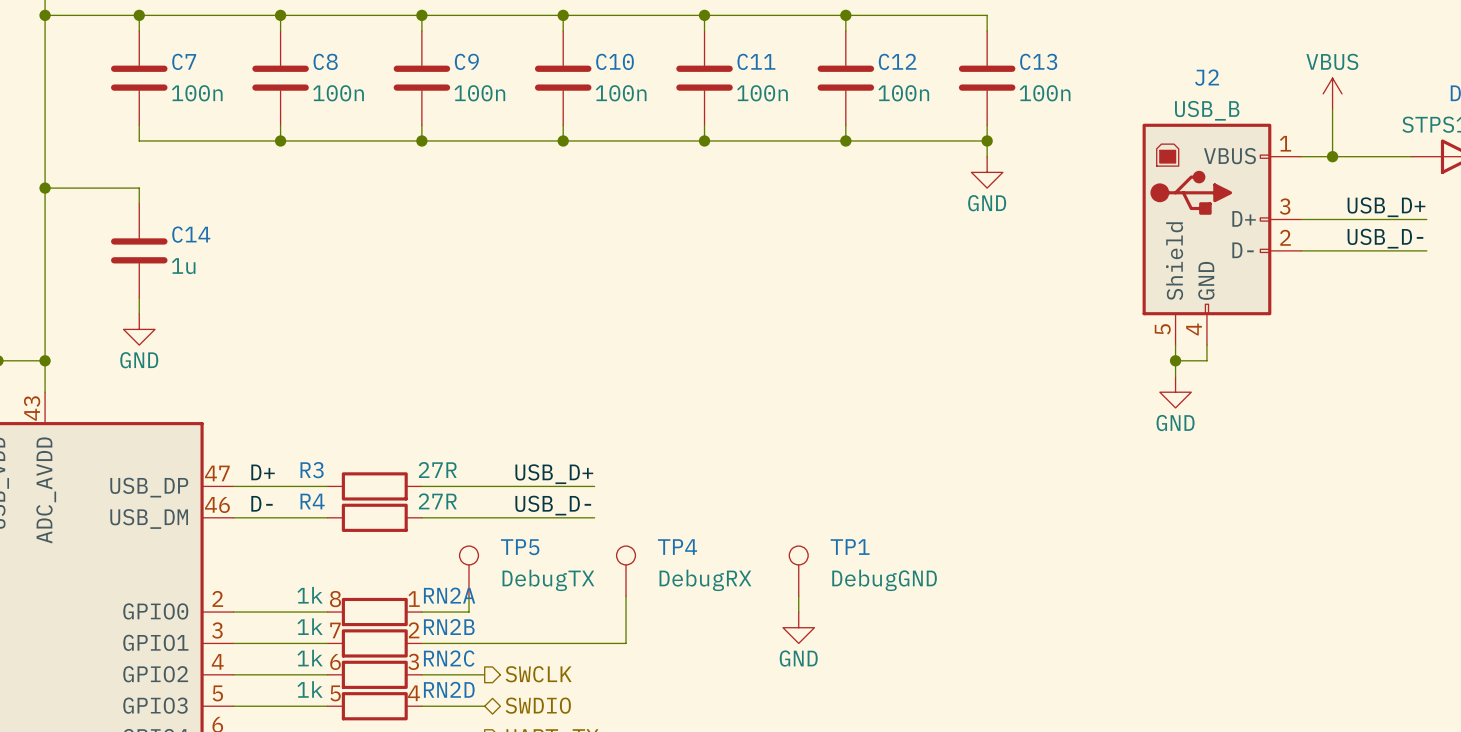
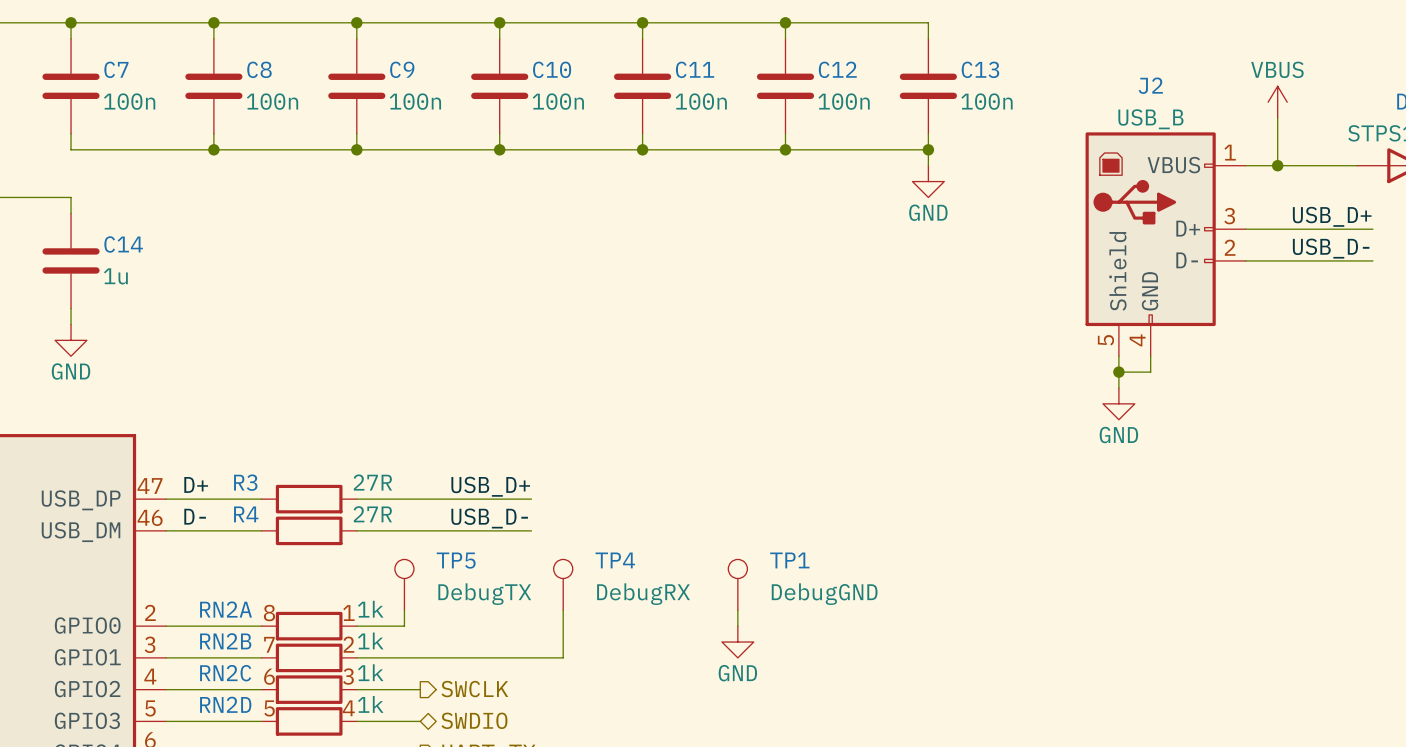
RN2A value position: 1k (310, 595) -> 1k (370, 609)
RN2A name position: RN2A (449, 595) -> RN2A (226, 609)
RN2B value position: 1k (310, 626) -> 1k (370, 640)
RN2B name position: RN2B (449, 627) -> RN2B (225, 641)
RN2C value position: 1k (310, 658) -> 1k (370, 672)
RN2C name position: RN2C (449, 658) -> RN2C (225, 673)
RN2D value position: 1k (310, 689) -> 1k (370, 704)
RN2D name position: RN2D (449, 689) -> RN2D (225, 704)

